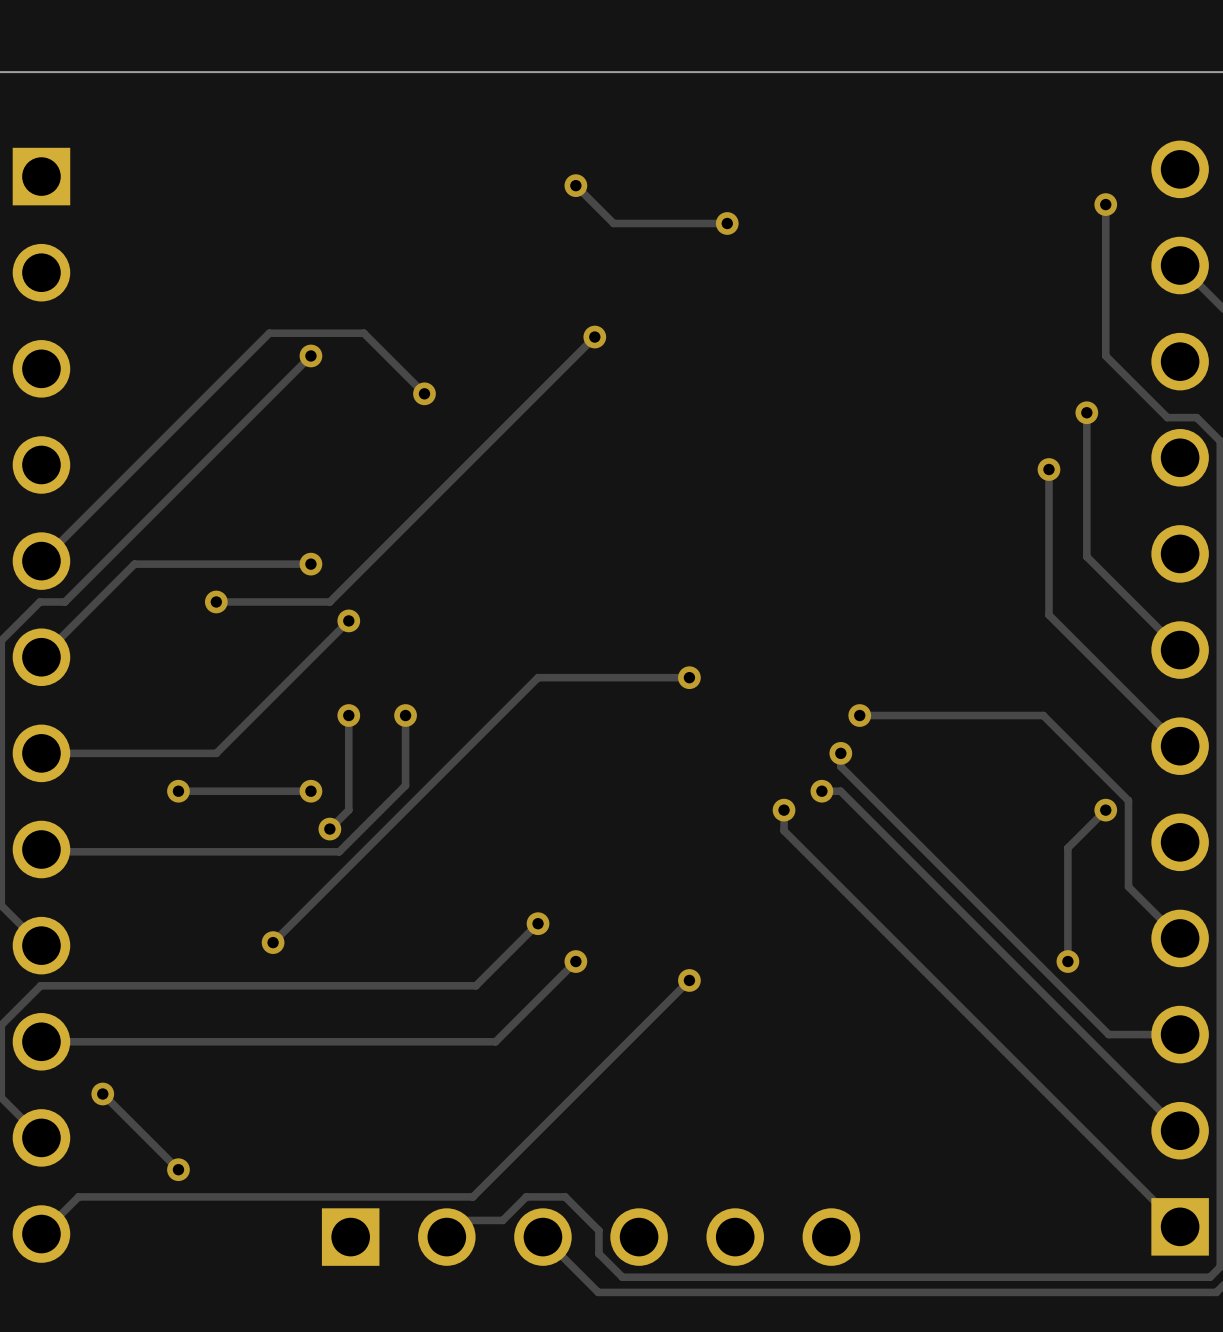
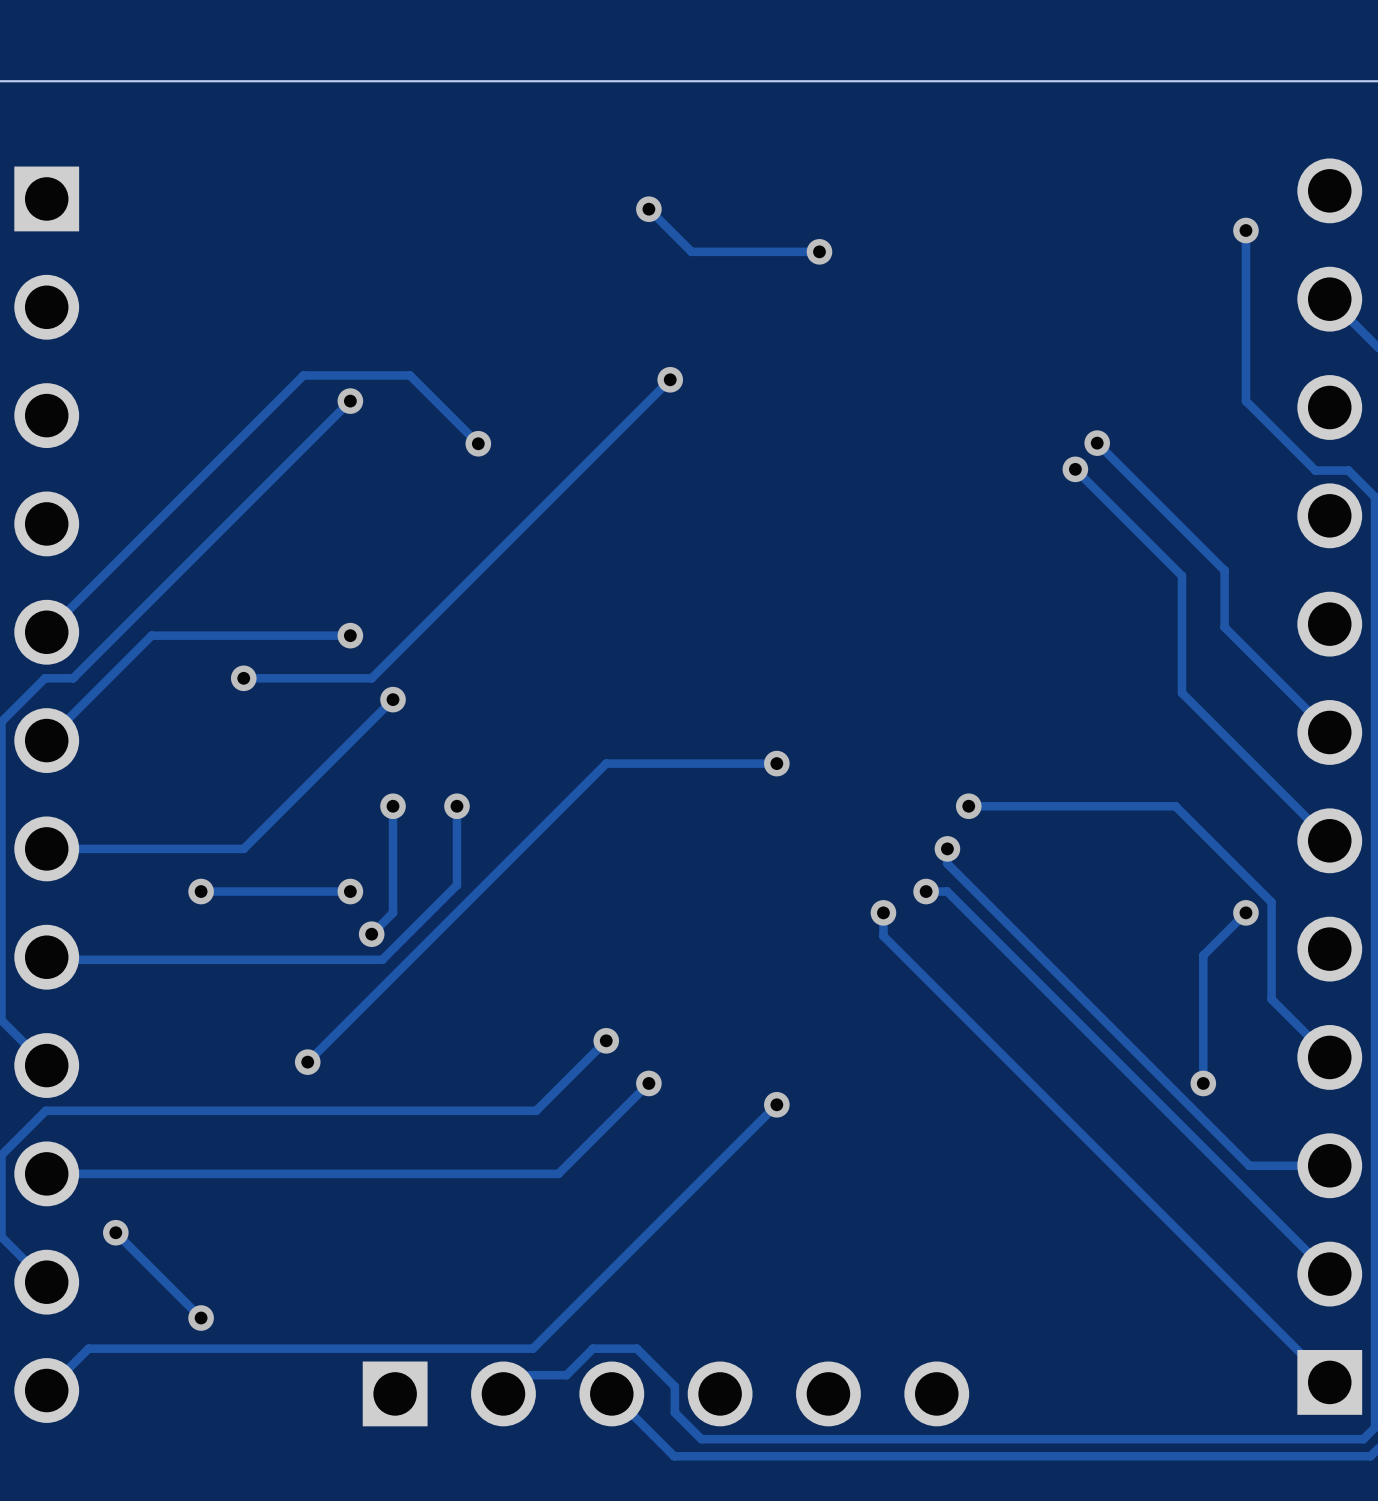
via: none -> (1097, 443)
track: (1086, 412) (1086, 506) -> (1097, 443) (1224, 570)
via: (1086, 412) -> none
via: none -> (1075, 469)
track: (1048, 469) (1048, 511) -> (1075, 469) (1181, 575)
via: (1048, 469) -> none

